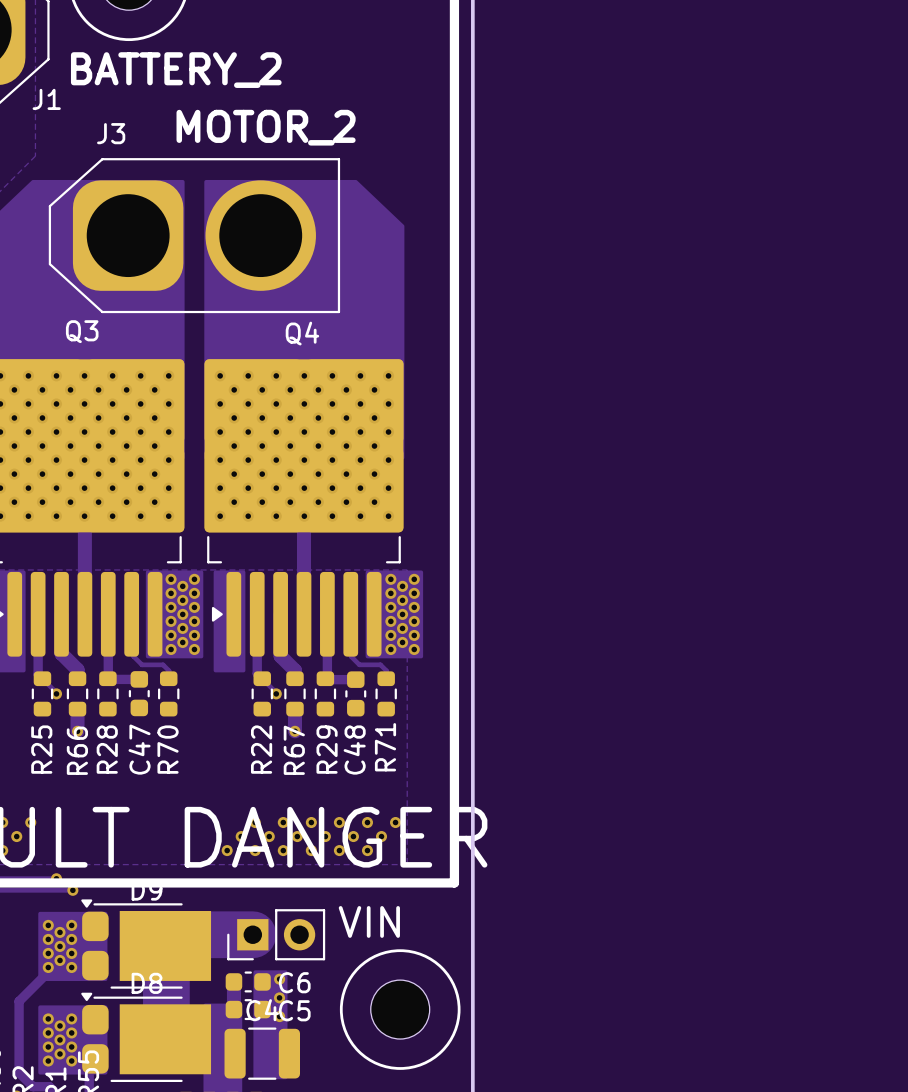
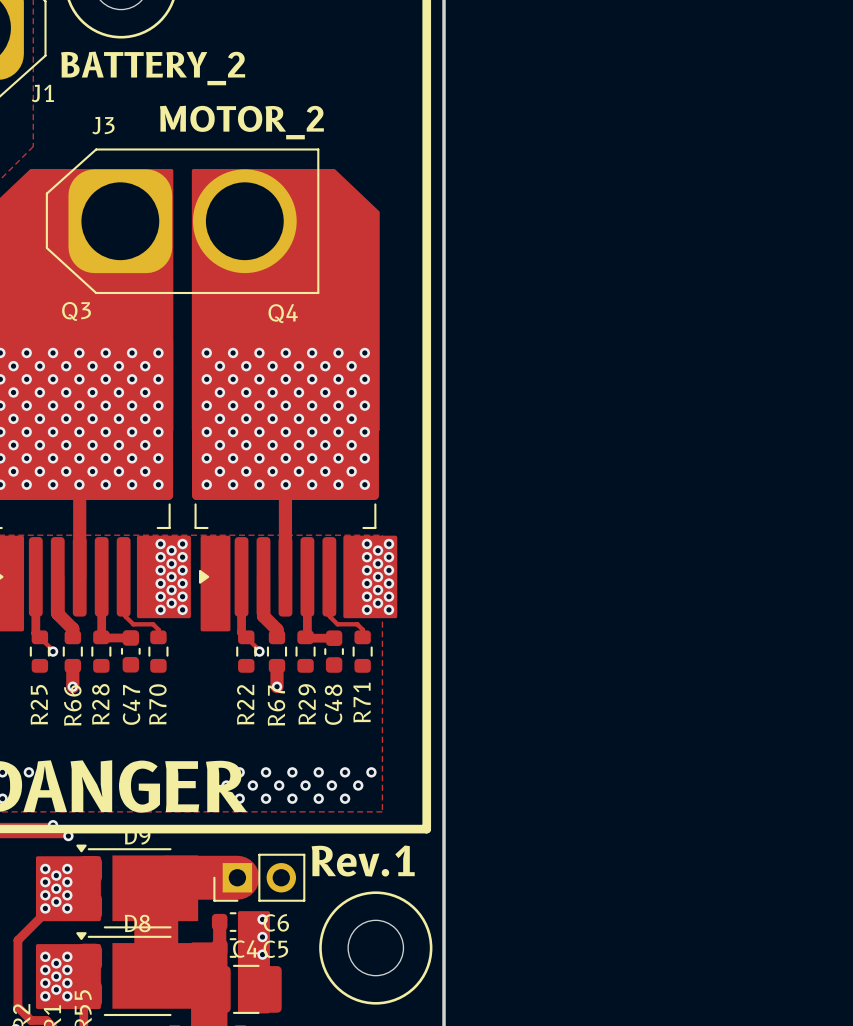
text: none -> Rev.1 (363, 861)
text: VIN (369, 921) -> none

